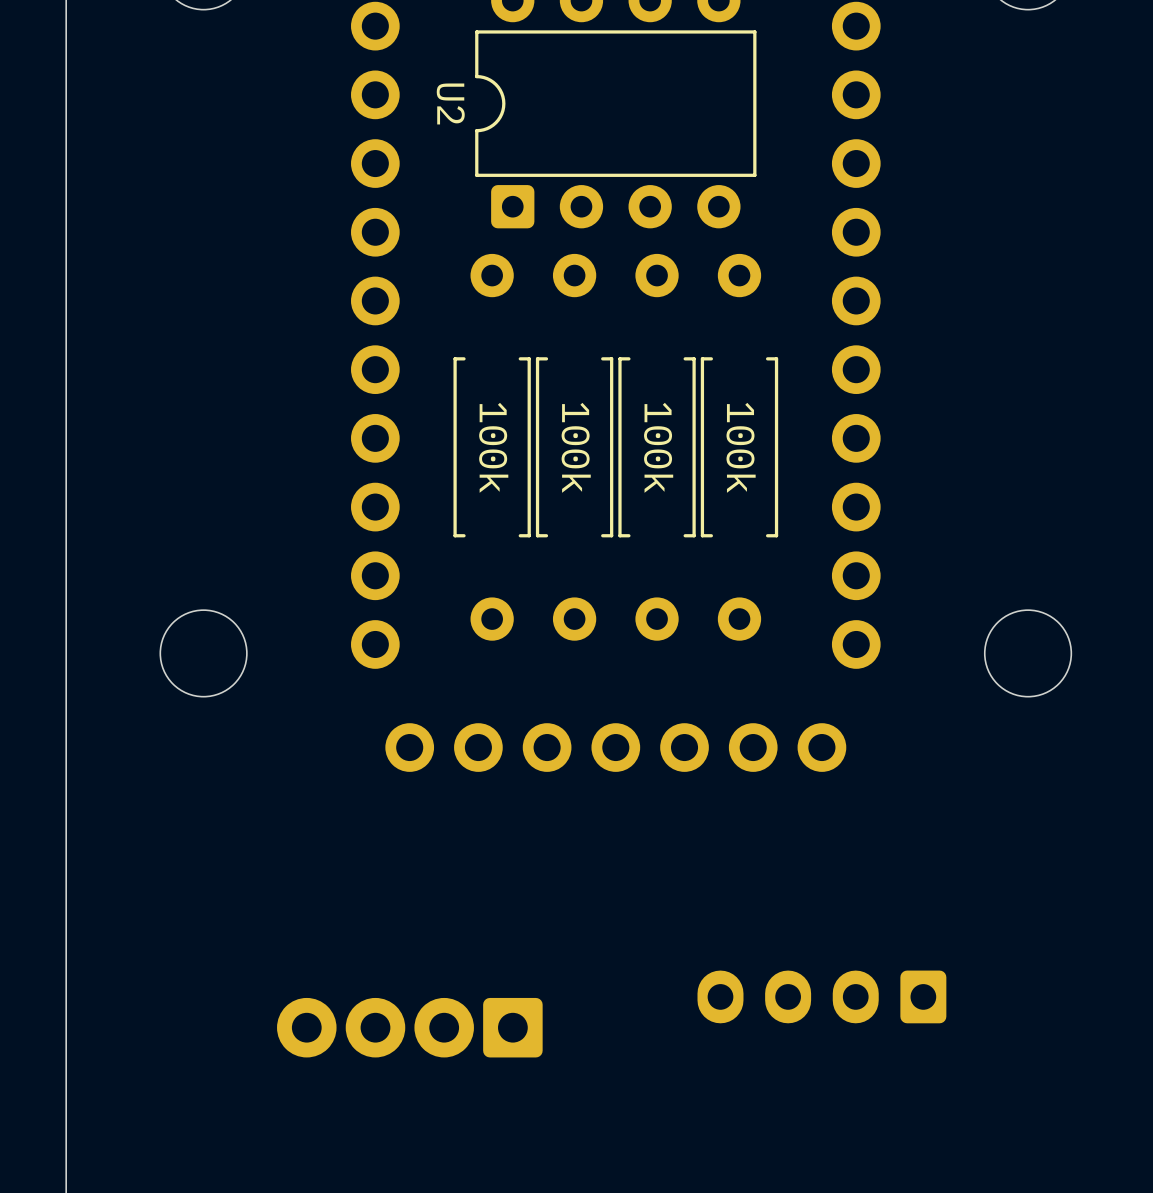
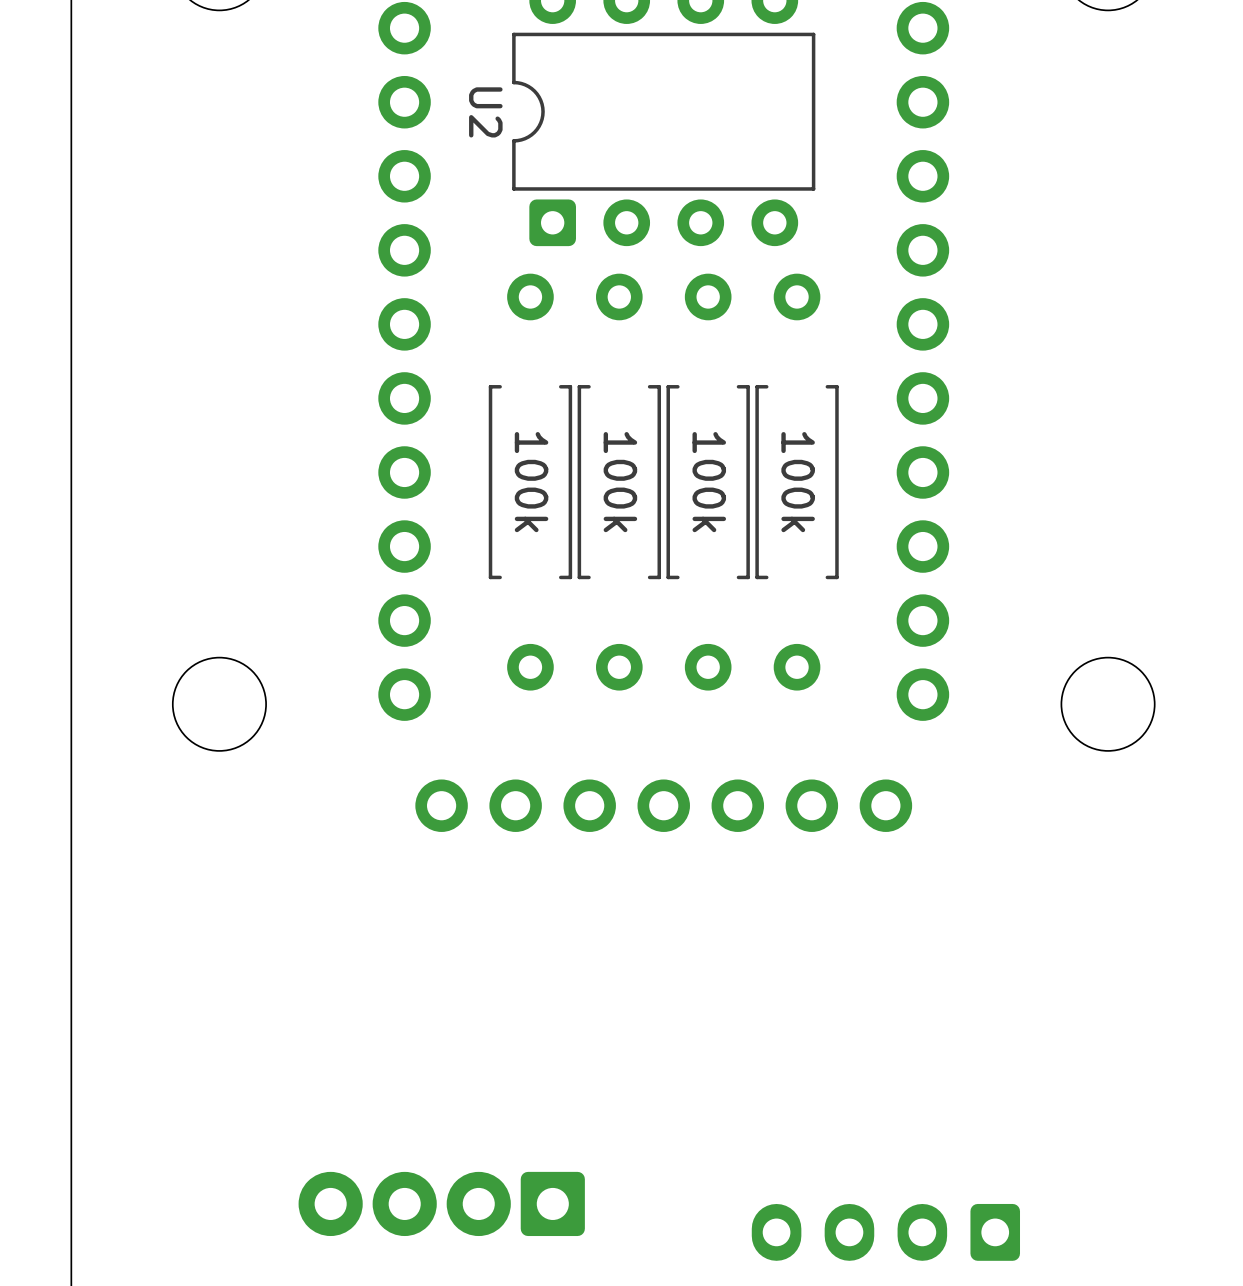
part position: (821, 996) -> (885, 1232)
part position: (409, 1027) -> (441, 1203)

